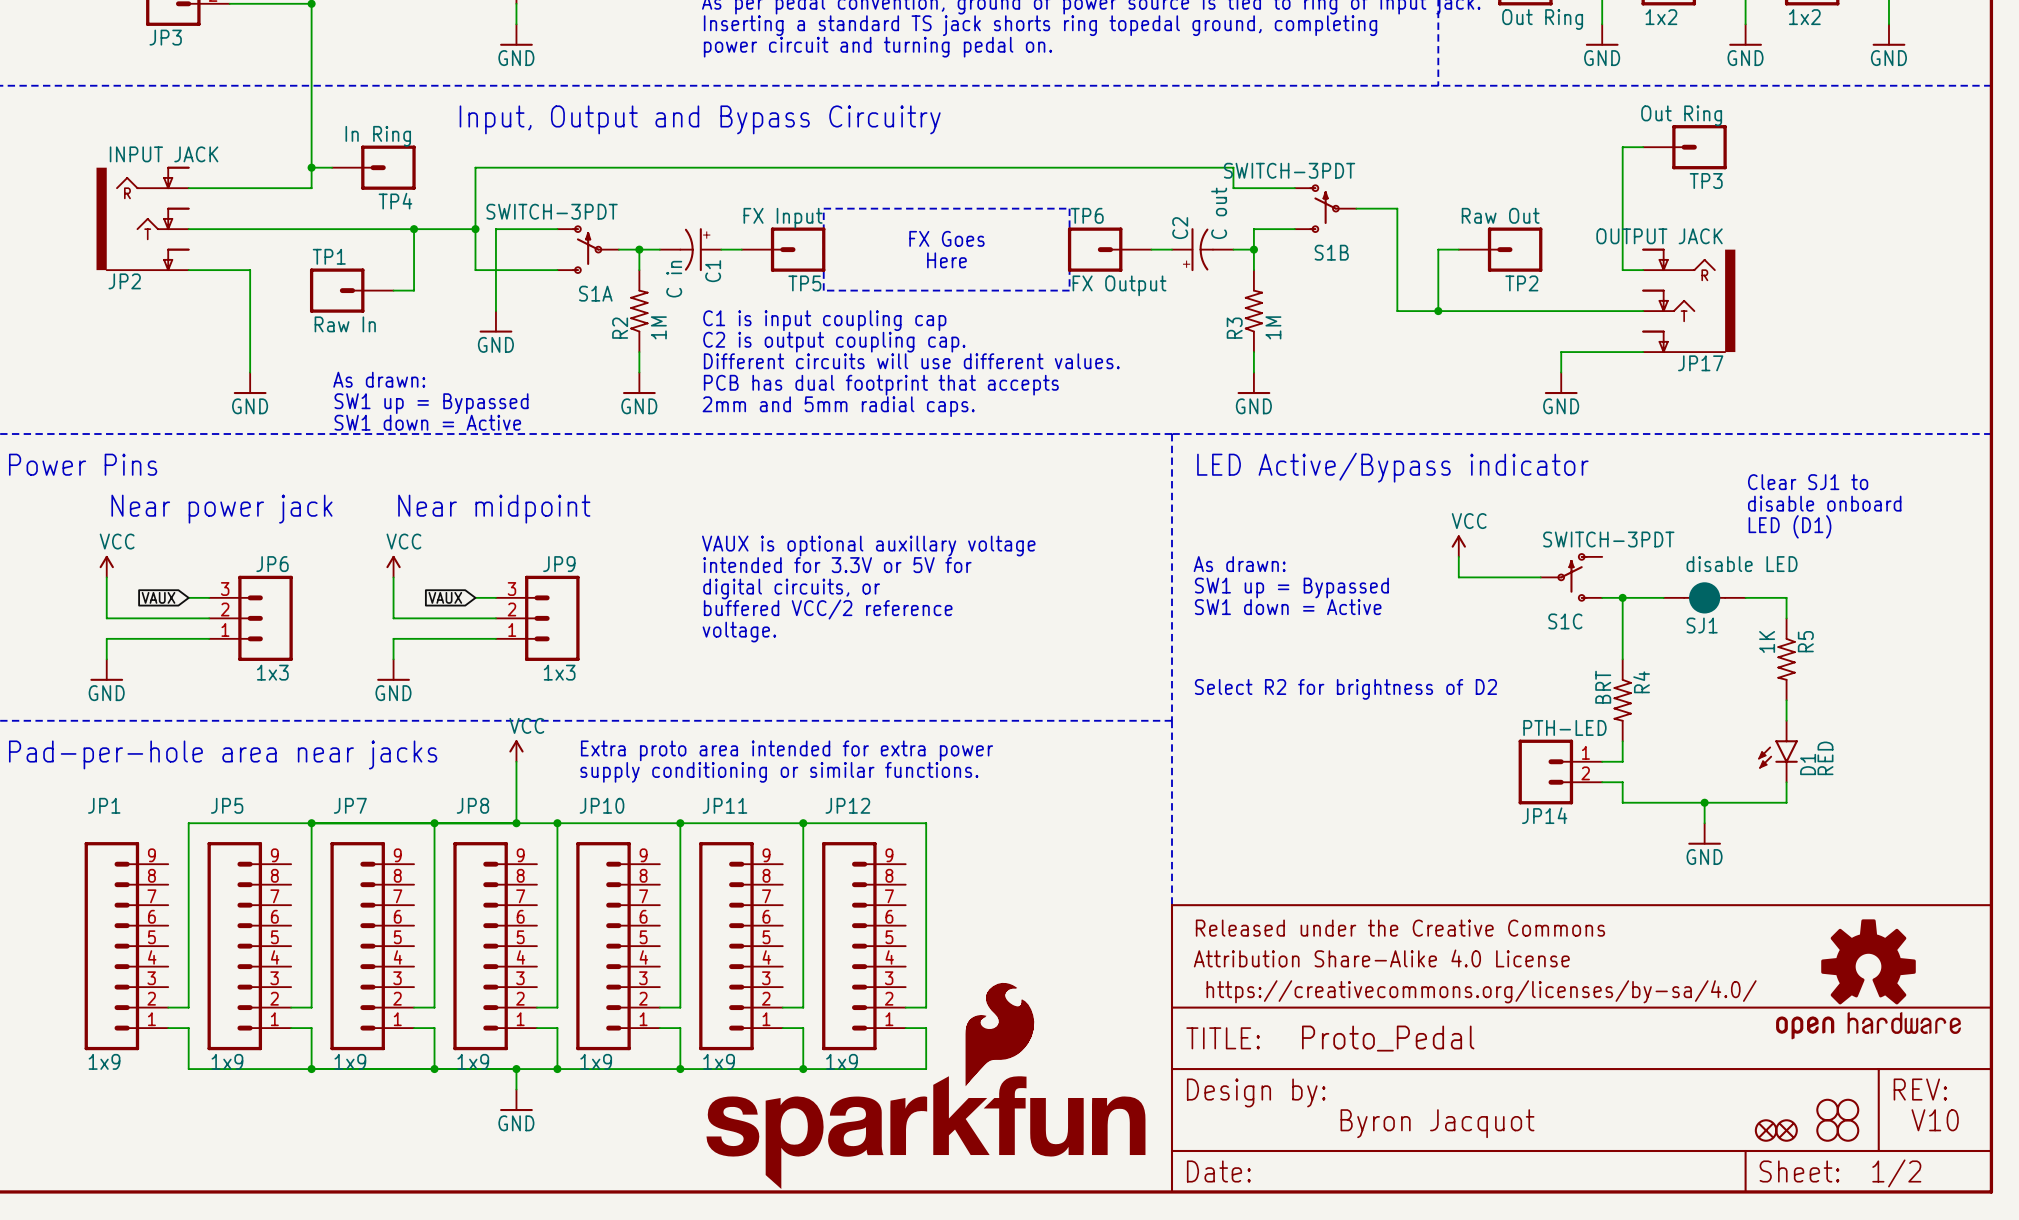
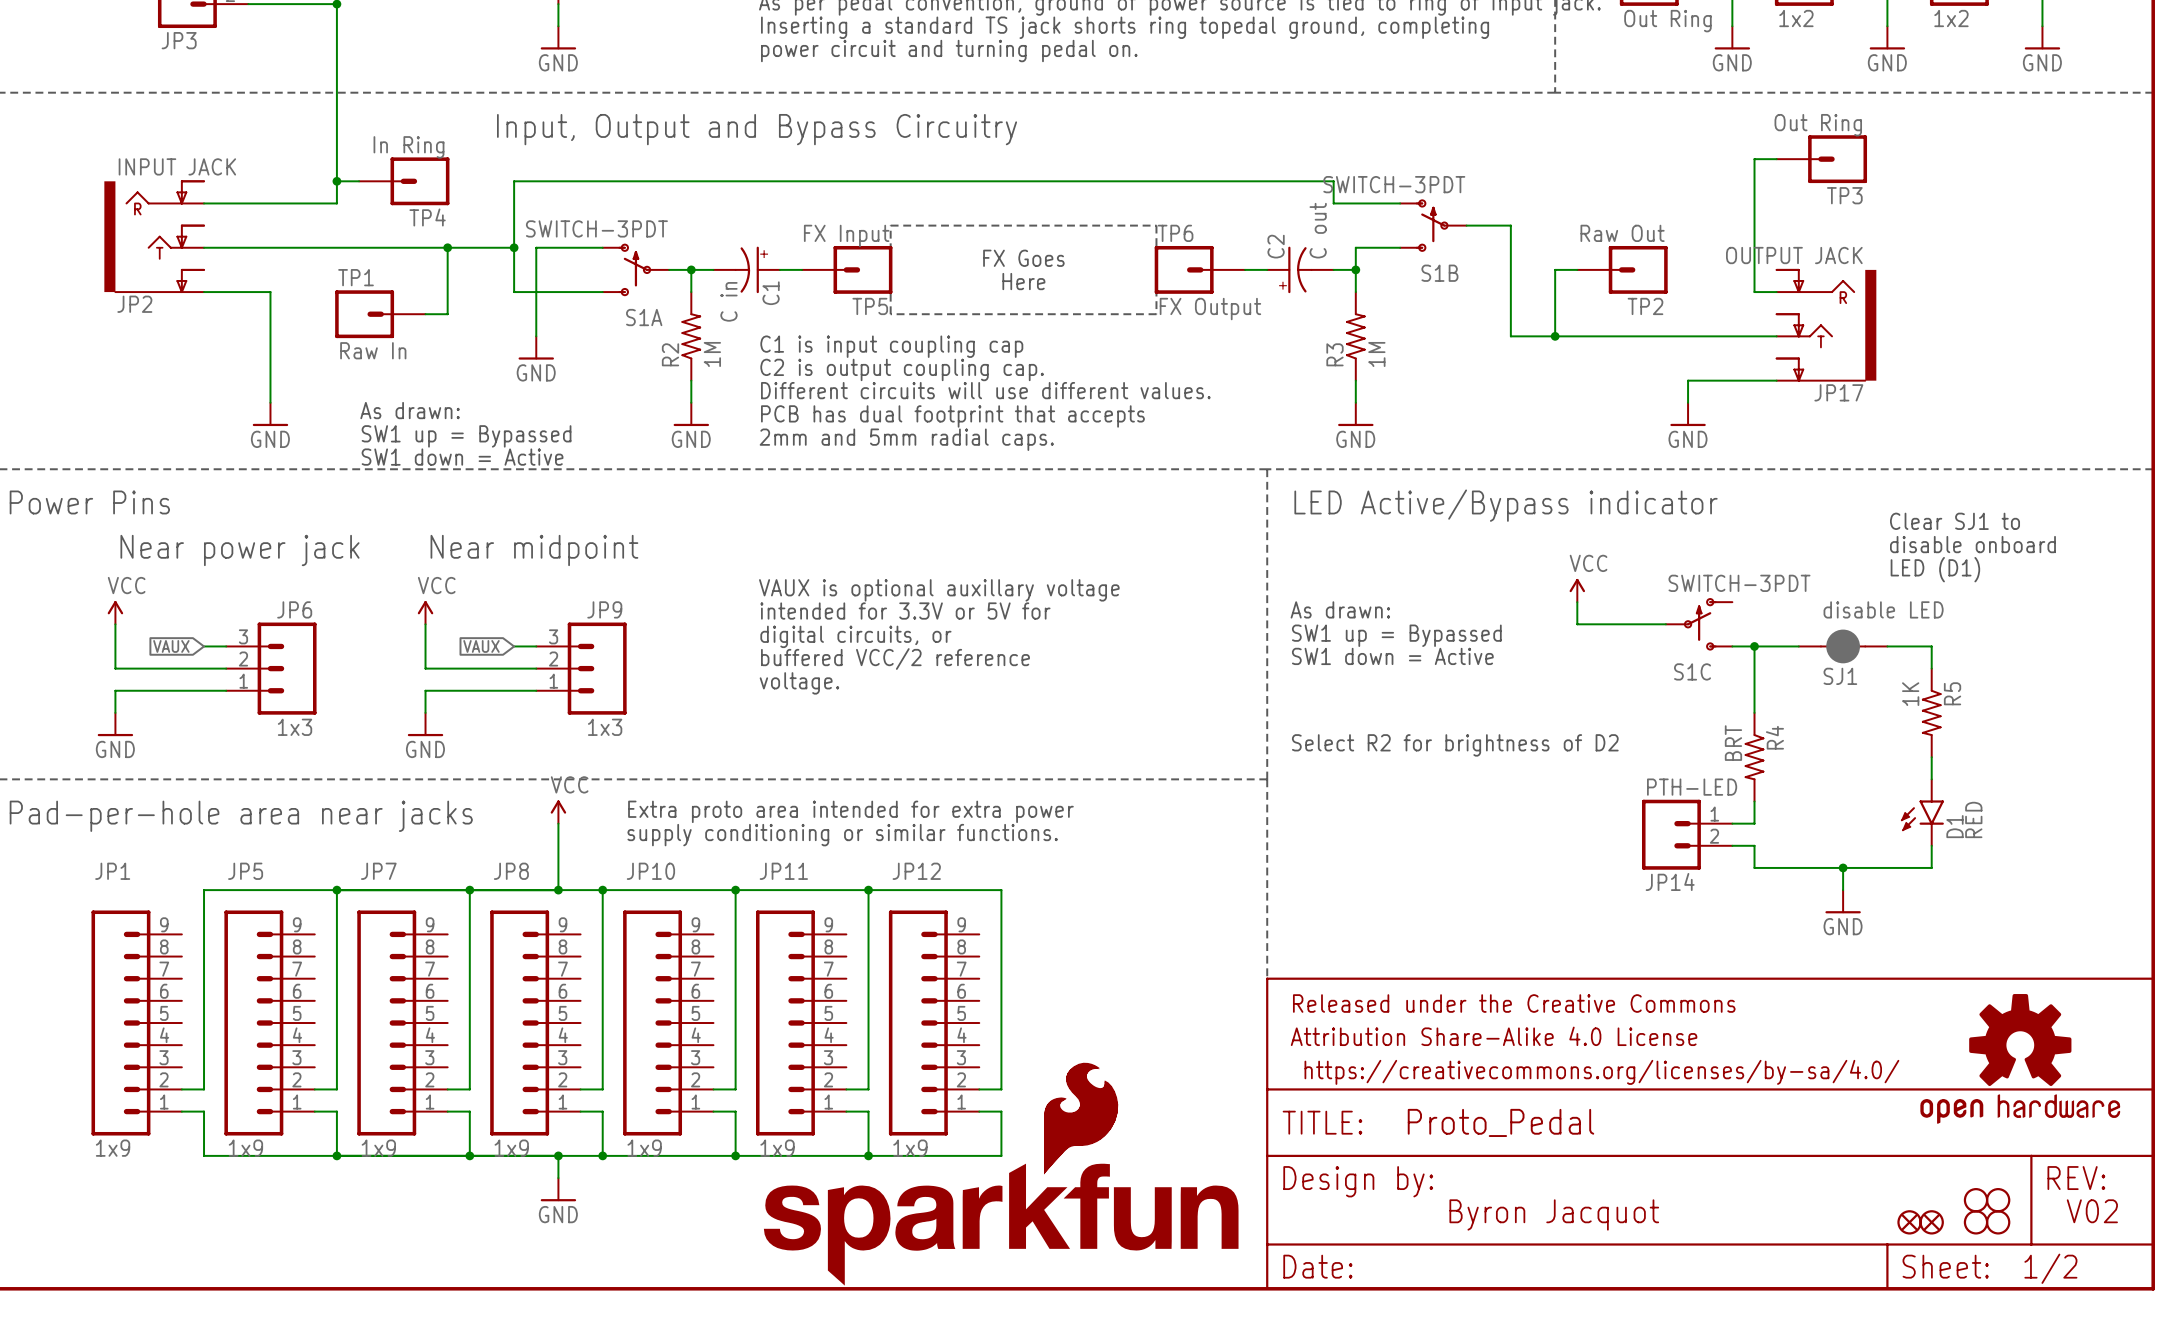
text: V10 (1935, 1120) -> V02 (2092, 1211)

